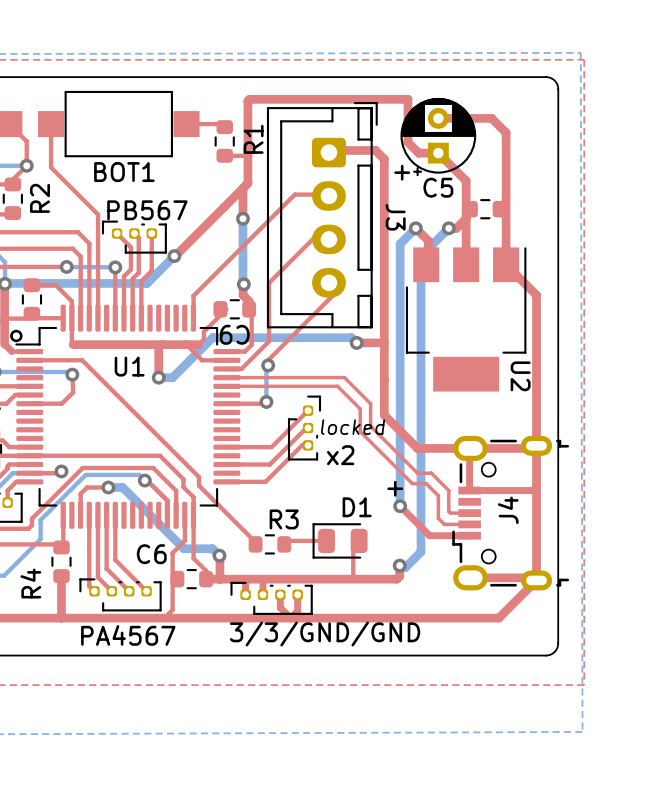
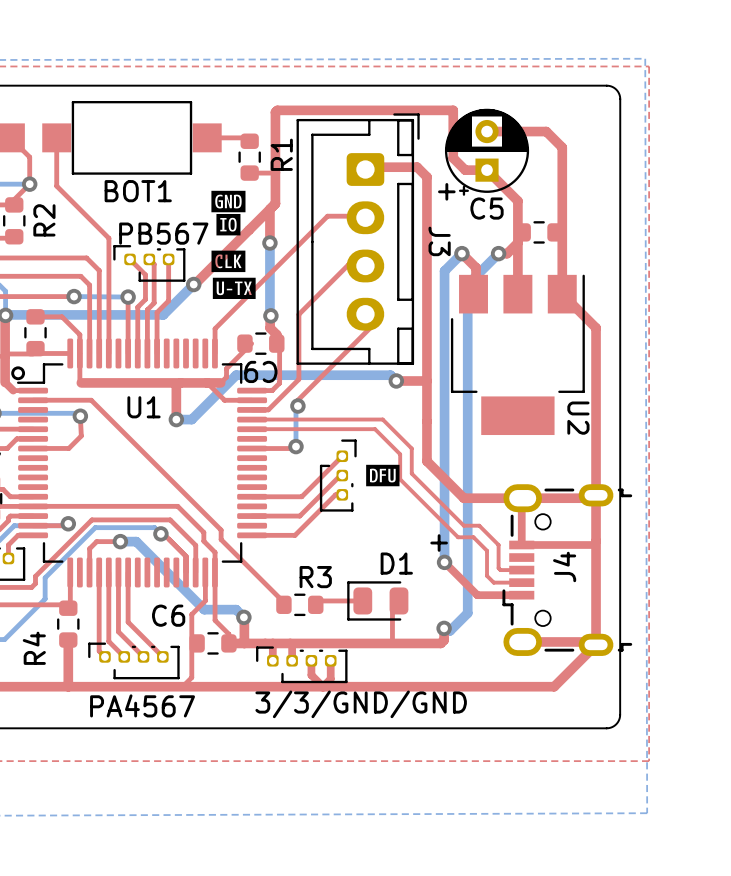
drawing: none -> [211, 190, 256, 300]
drawing: none -> [366, 464, 400, 487]
text: locked (353, 427) -> none
x2 name: x2 (340, 455) -> none

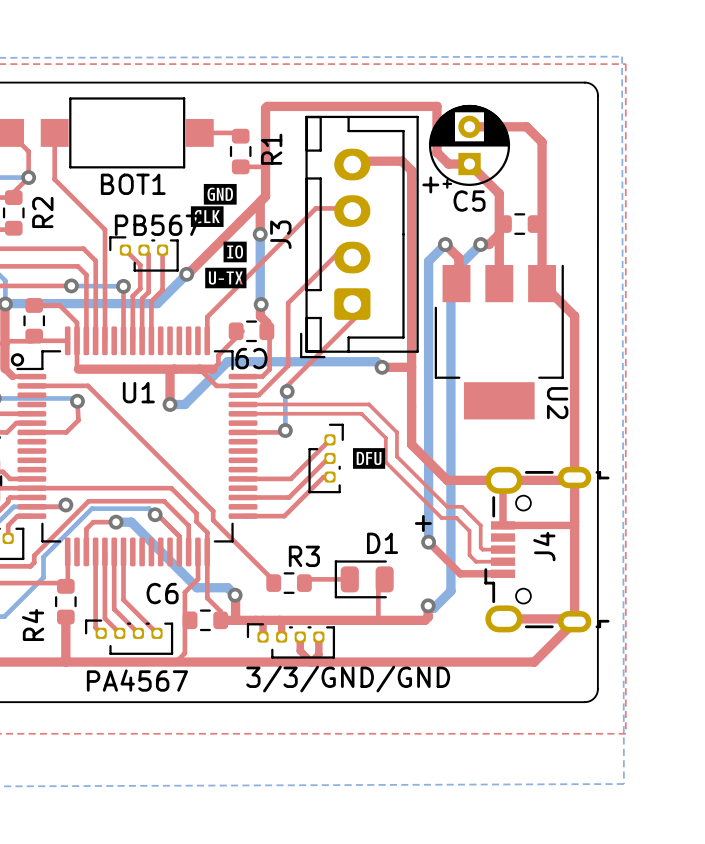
drawing position: (228, 224) -> (235, 251)
J3 rotation: 0° (358, 239) -> 180° (359, 236)
drawing position: (228, 261) -> (207, 216)

